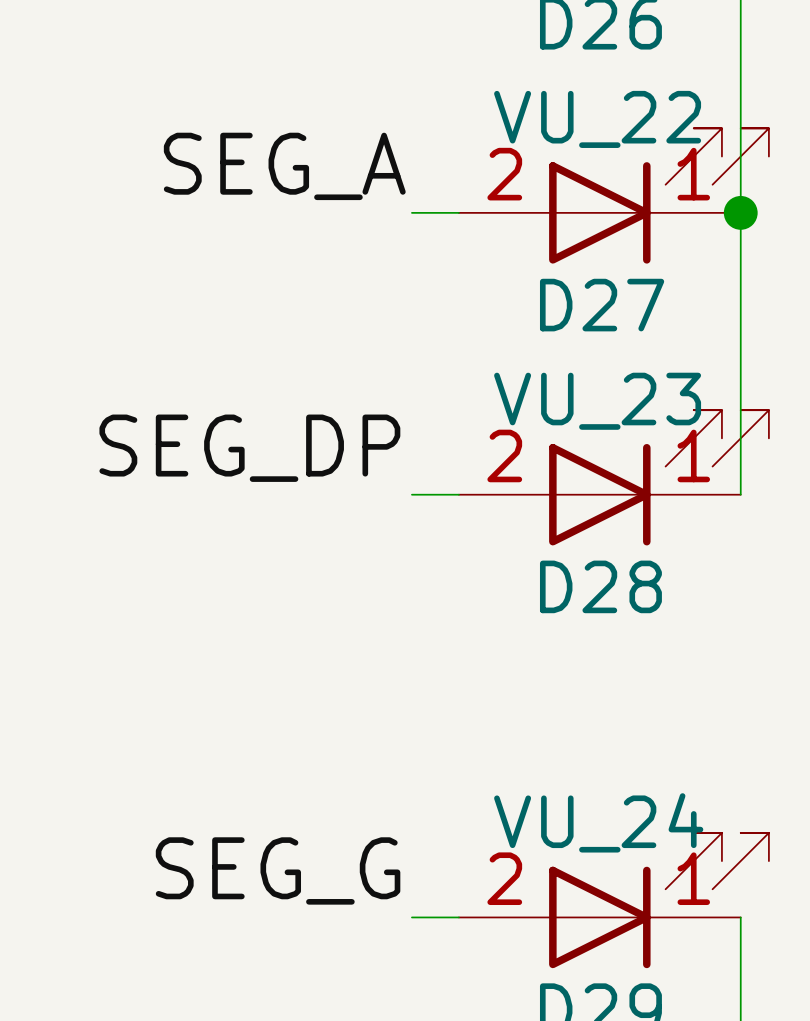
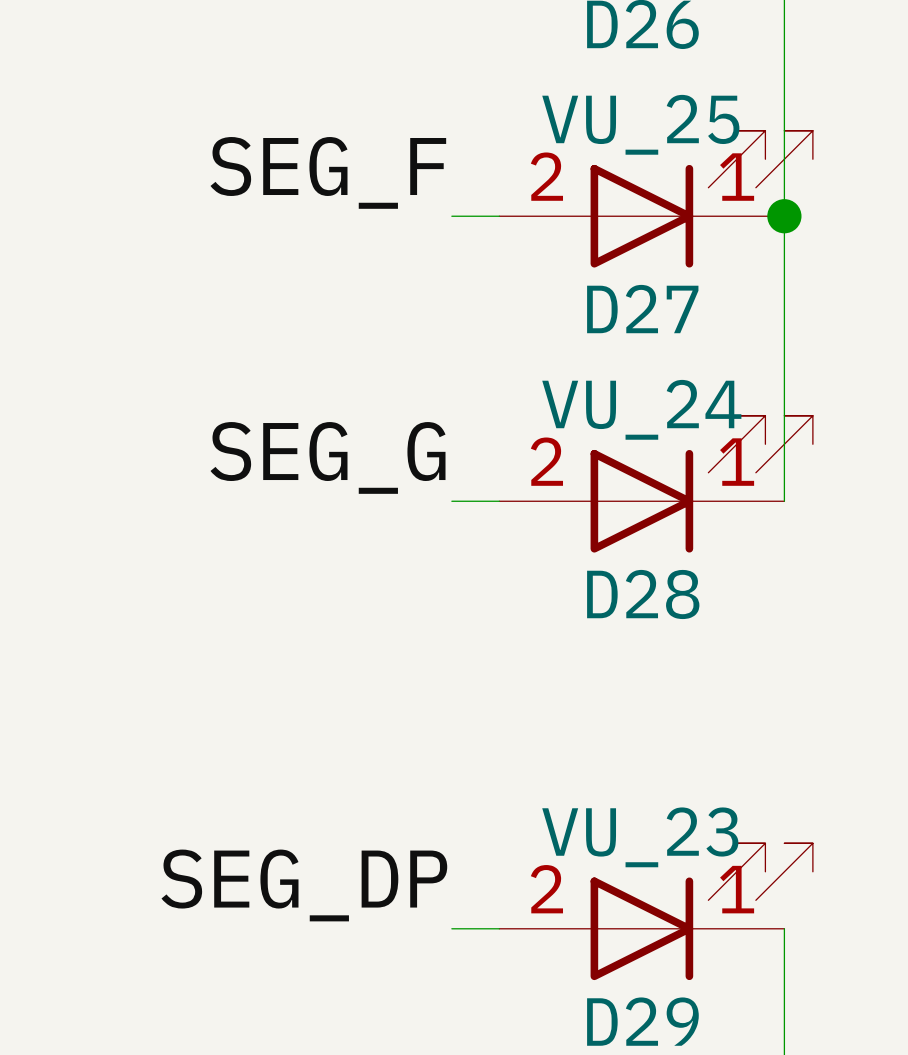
D27 value: VU_22 (597, 119) -> VU_25 (640, 124)
label: SEG_A (284, 166) -> SEG_F (328, 172)
D28 value: VU_23 (597, 401) -> VU_24 (641, 409)
label: SEG_DP (249, 448) -> SEG_G (328, 457)
D29 value: VU_24 (598, 822) -> VU_23 (640, 837)
label: SEG_G (278, 870) -> SEG_DP (304, 885)

